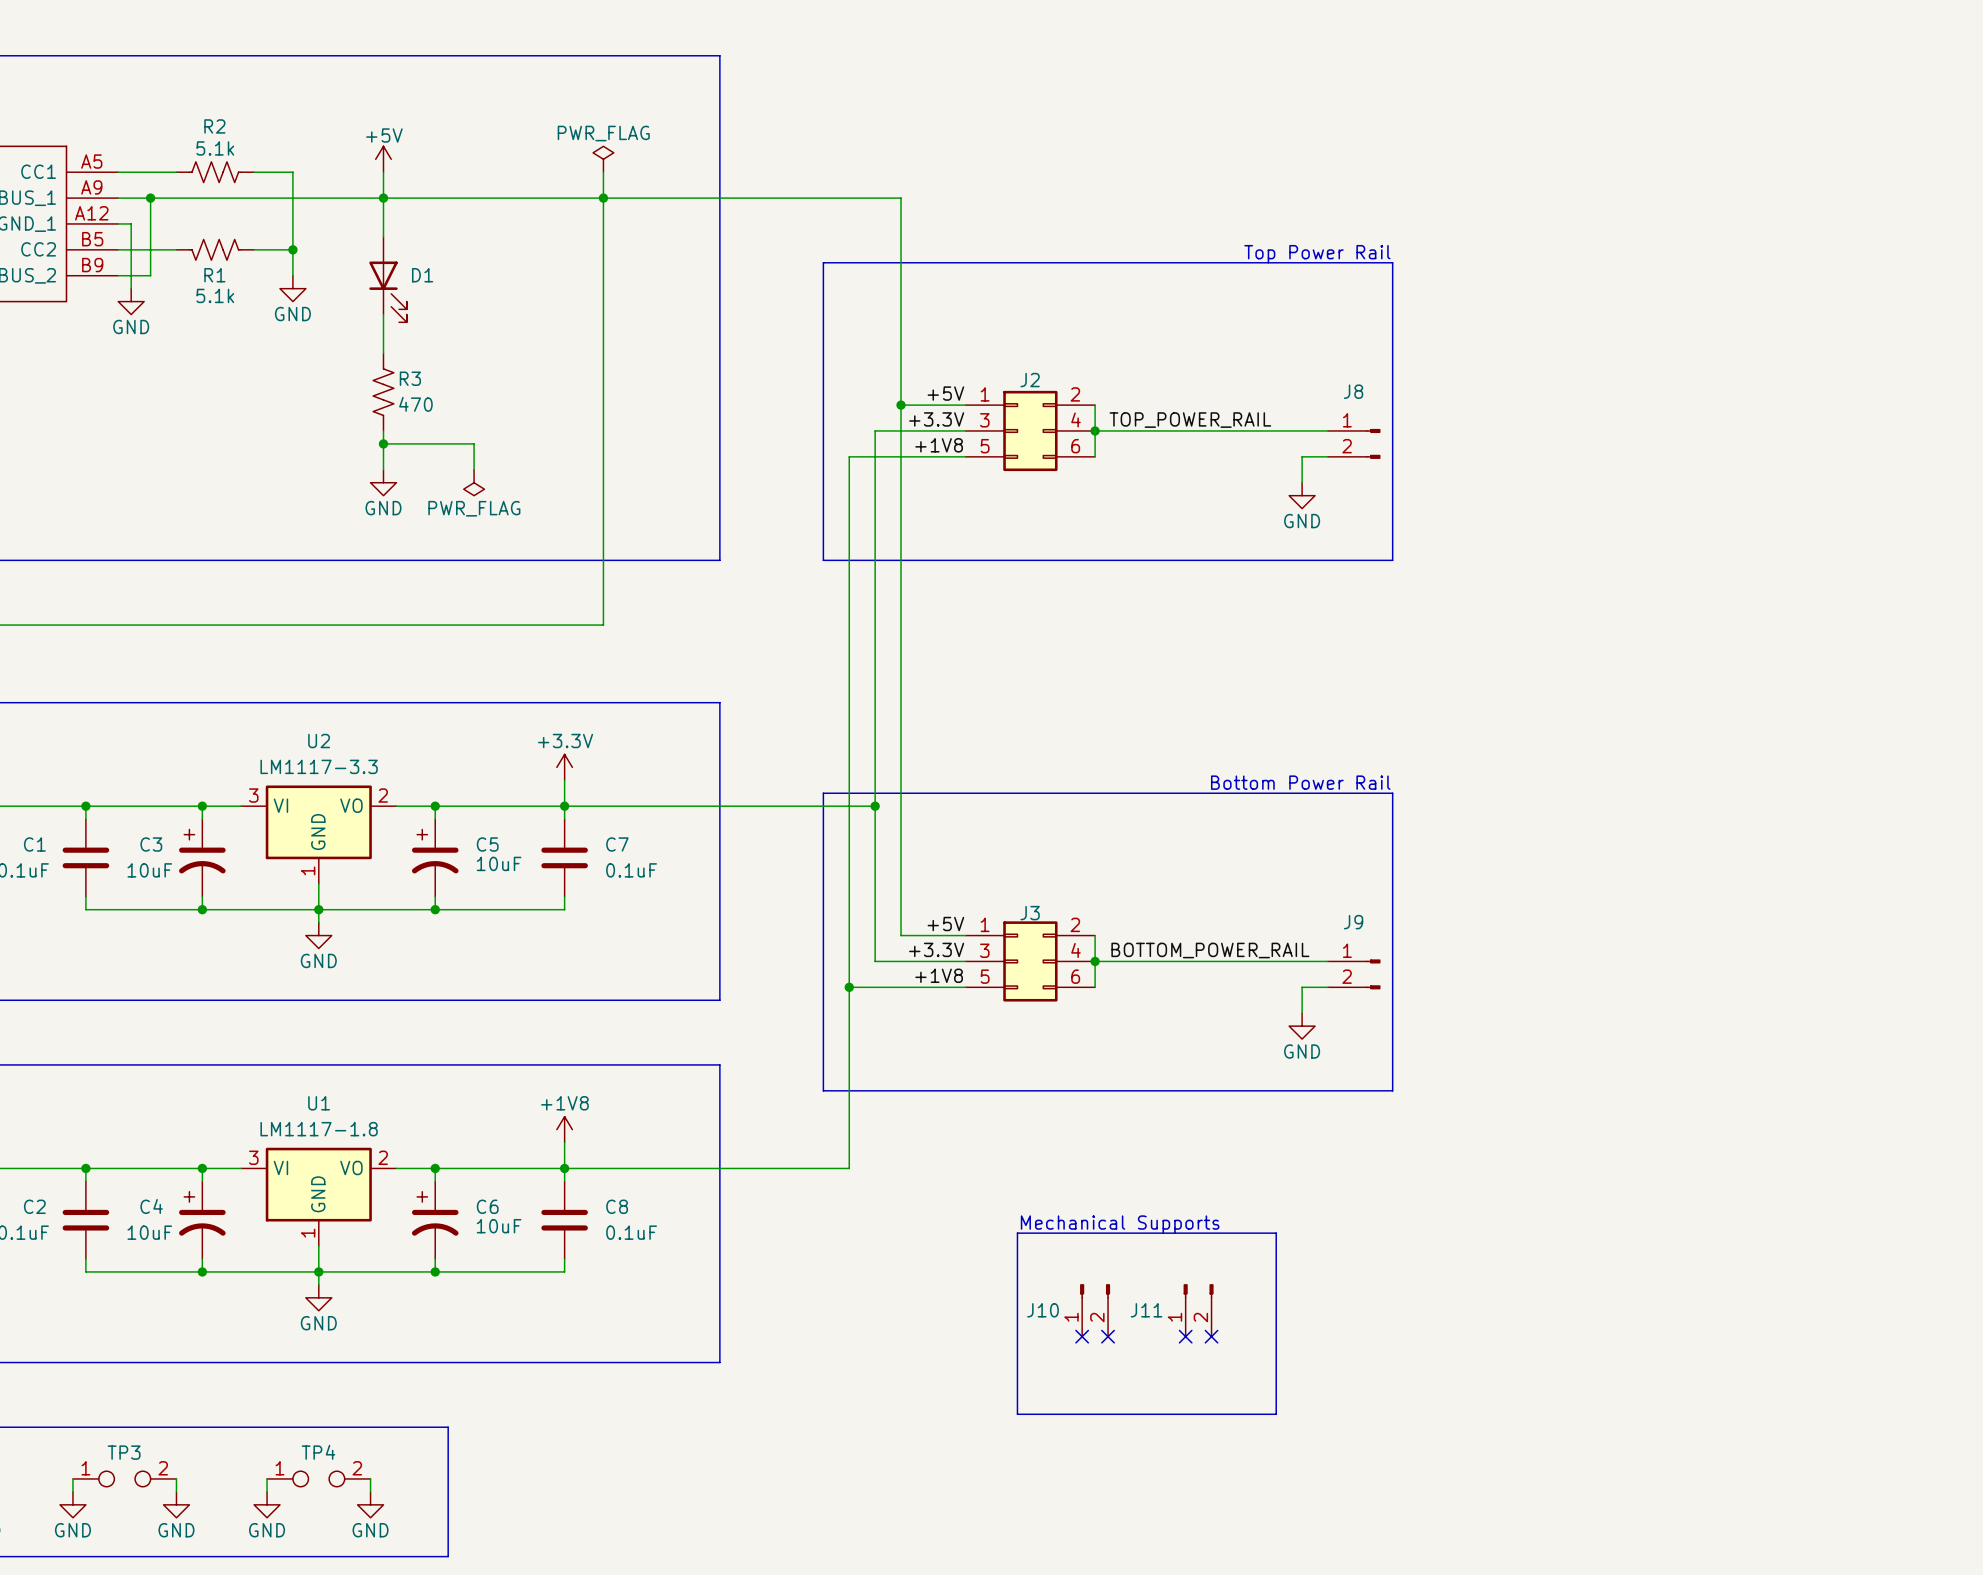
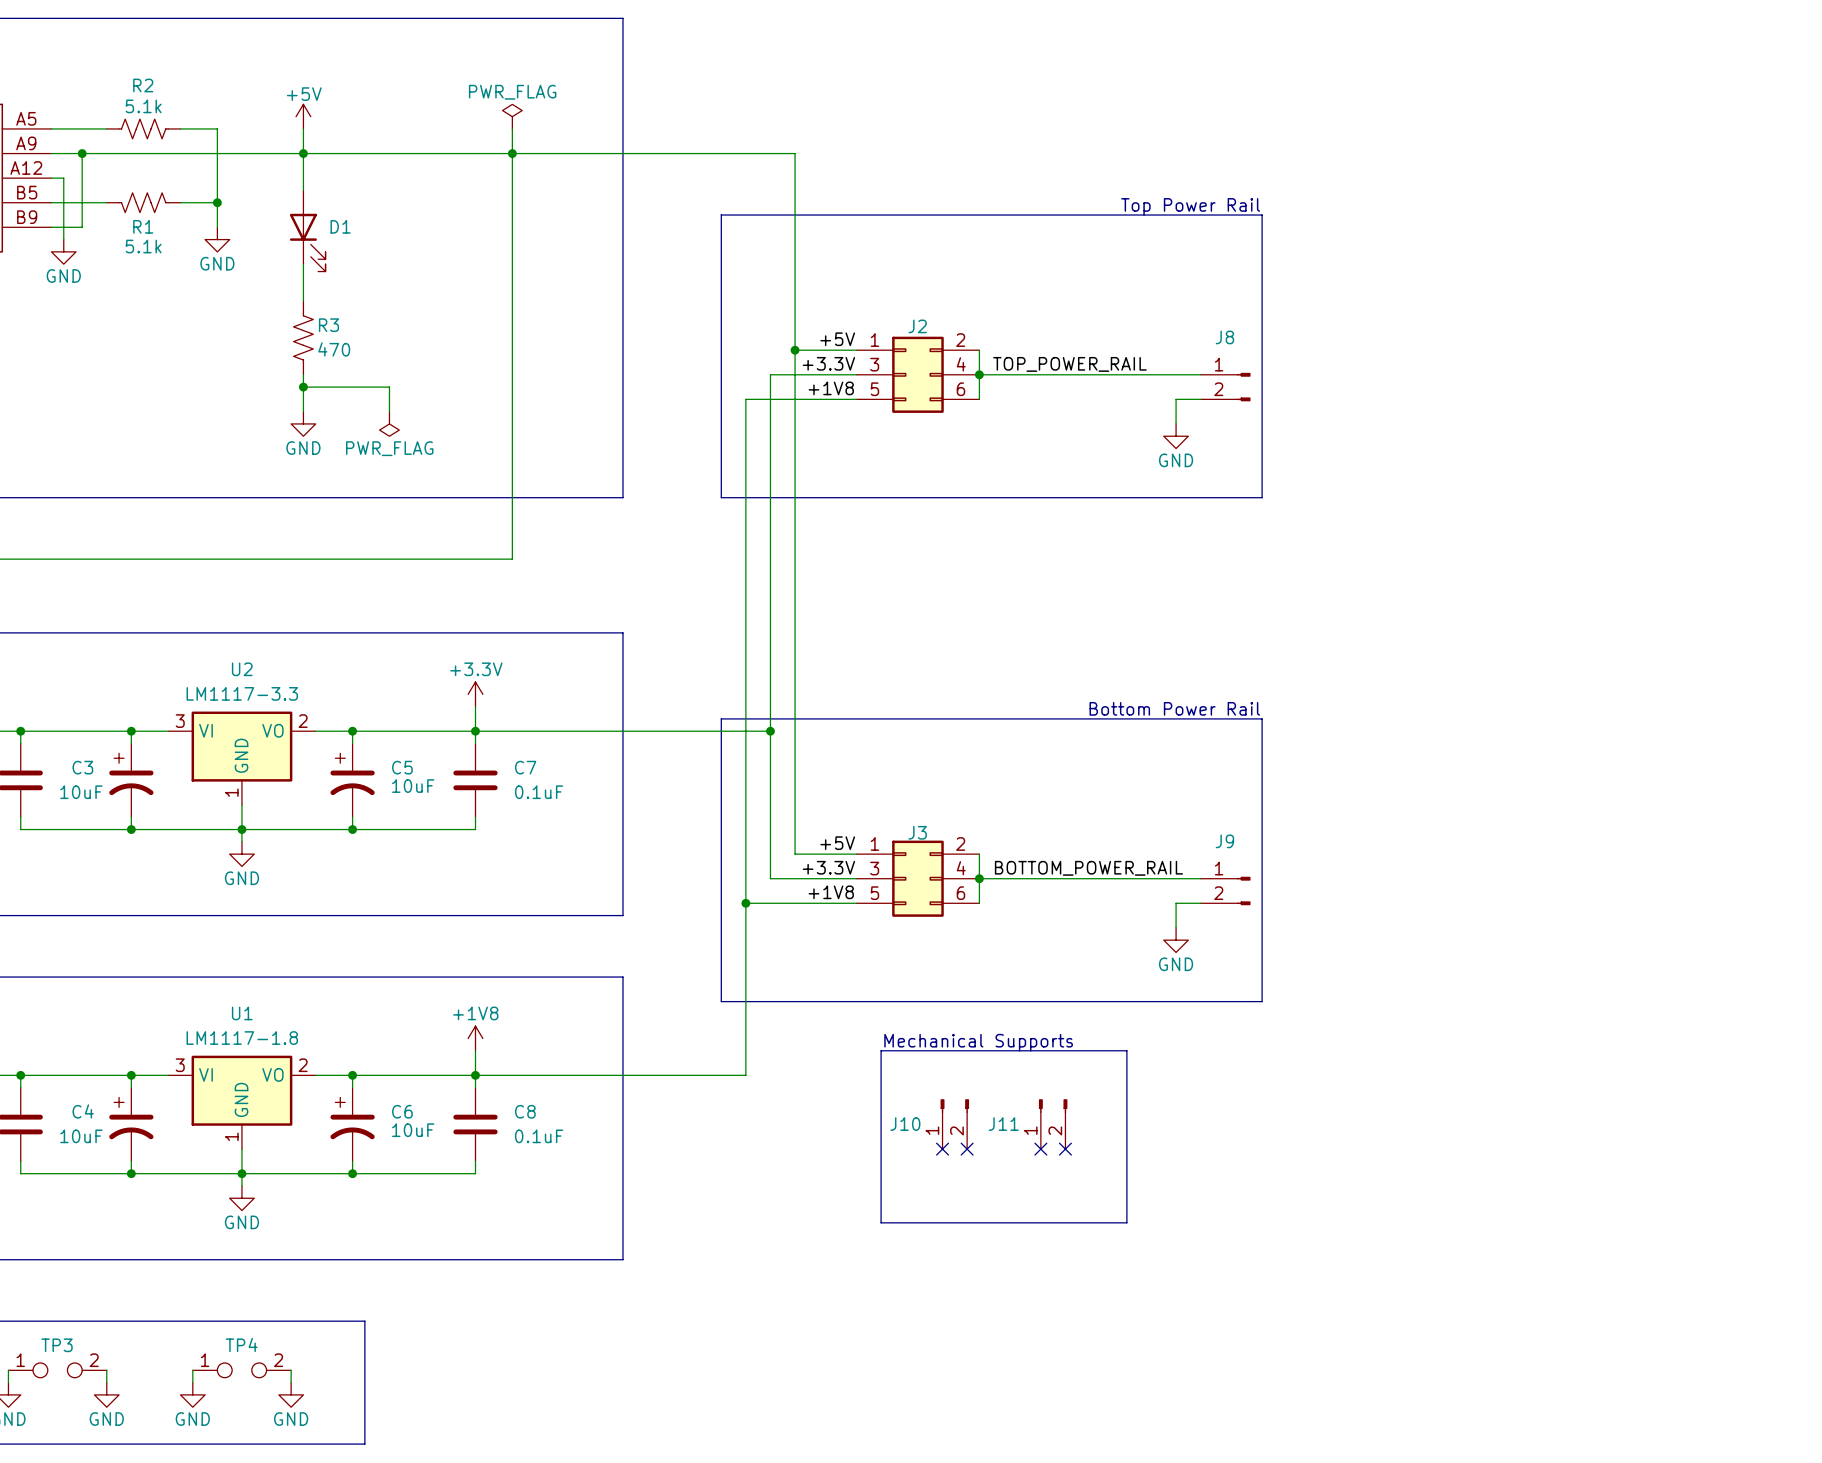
text position: Mechanical Supports (1120, 1224) -> Mechanical Supports (978, 1042)
line: (1017, 1233) (1276, 1233) (1276, 1414) (1017, 1414) (1017, 1233) -> (881, 1050) (1126, 1050) (1126, 1222) (881, 1222) (881, 1050)
no-connect mark: none -> (942, 1149)
no-connect mark: none -> (967, 1149)
no-connect mark: none -> (1040, 1149)
no-connect mark: none -> (1065, 1149)
J10 position: (1095, 1310) -> (954, 1124)
J11 position: (1198, 1310) -> (1053, 1124)
no-connect mark: (1082, 1336) -> none
no-connect mark: (1108, 1336) -> none
no-connect mark: (1185, 1336) -> none
no-connect mark: (1211, 1336) -> none

